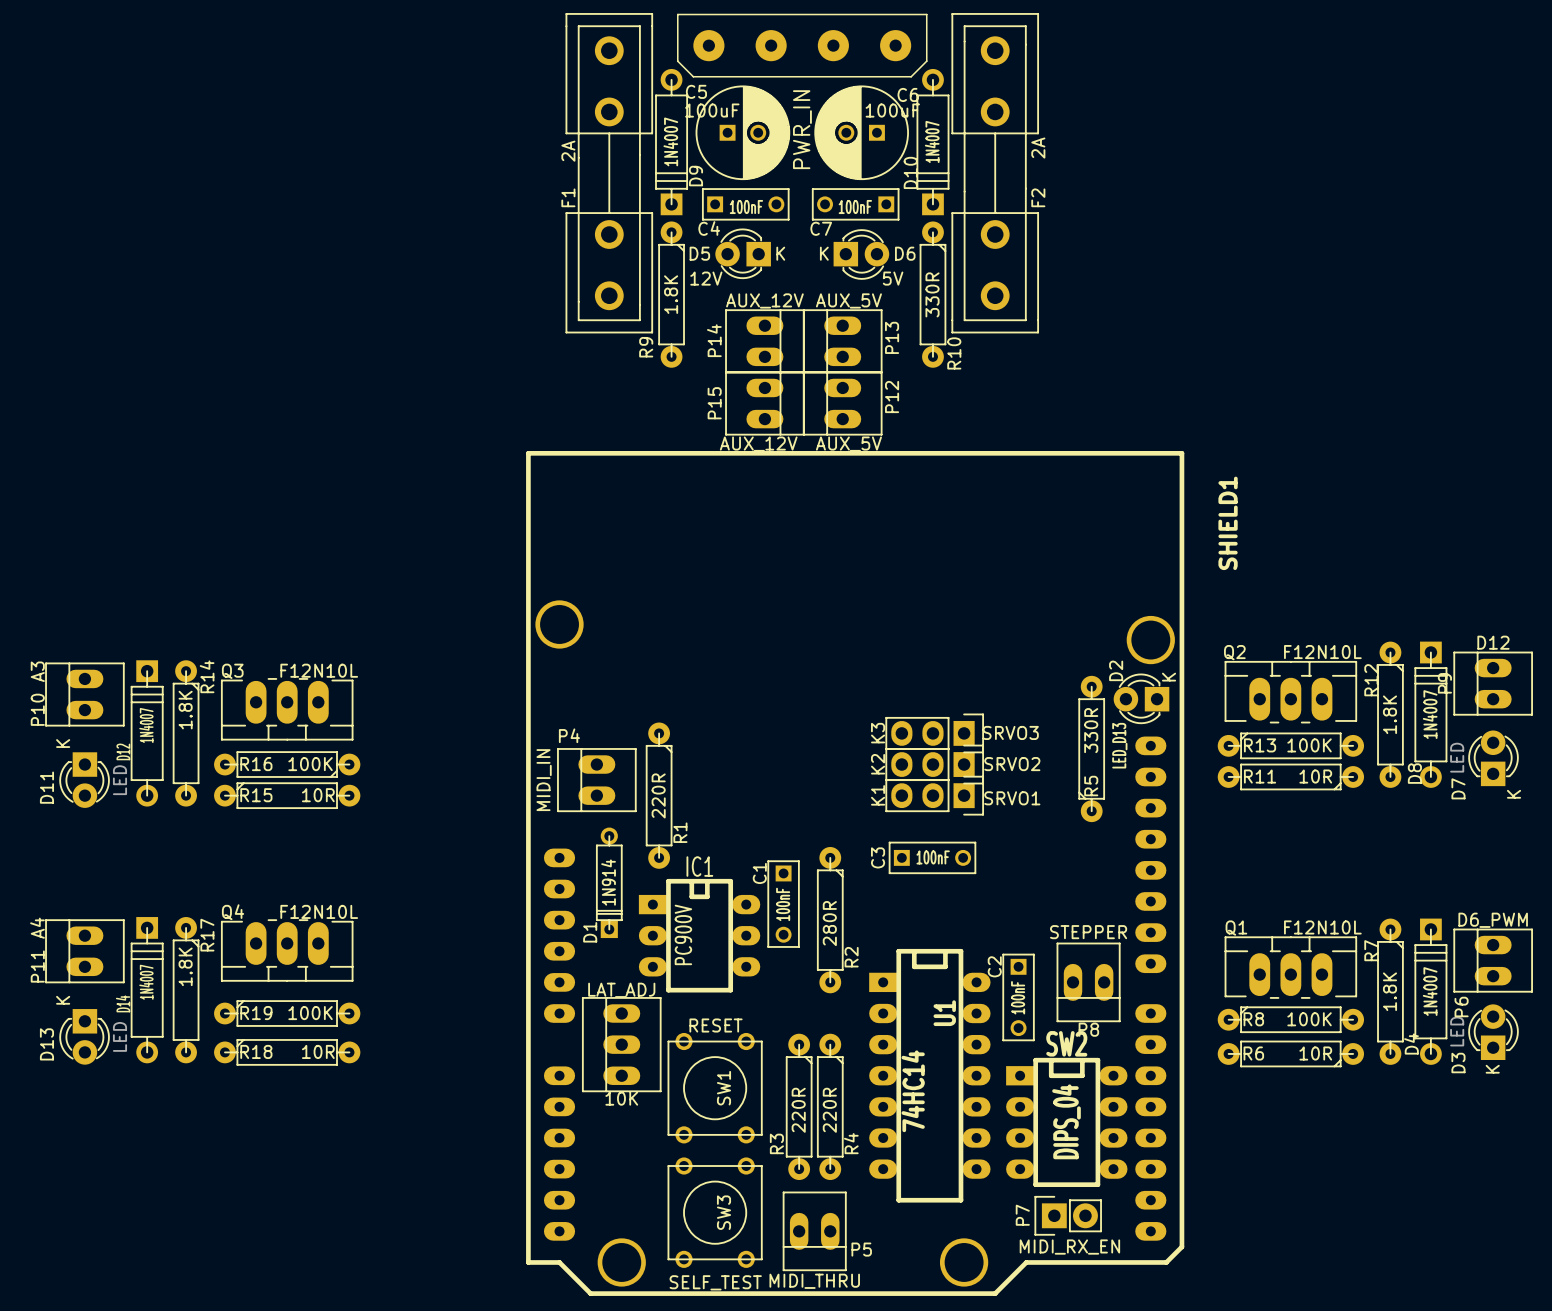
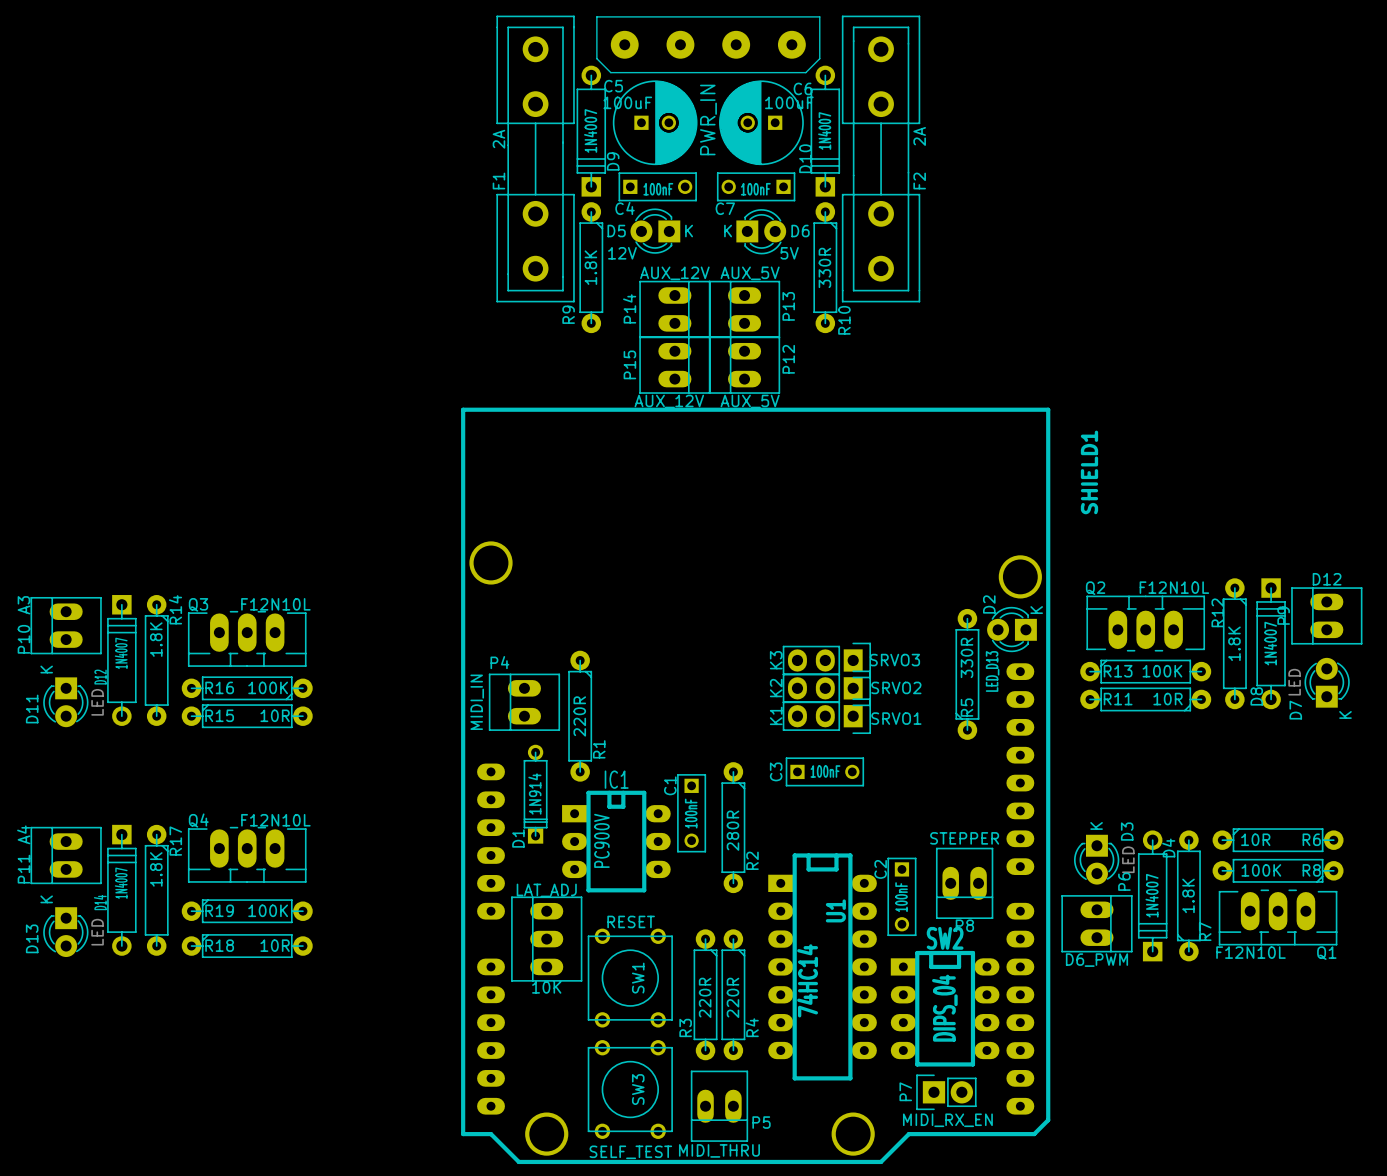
P6 rotation: 0° (1493, 960) -> 180° (1096, 923)
P6 position: (1493, 960) -> (1096, 923)
Q1 rotation: 0° (1290, 967) -> 180° (1278, 917)
Q1 position: (1290, 967) -> (1278, 917)
R7 rotation: 0° (1390, 991) -> 180° (1188, 895)
D4 rotation: 0° (1430, 991) -> 180° (1152, 895)
D4 position: (1430, 991) -> (1152, 895)
R8 rotation: 0° (1290, 1019) -> 180° (1278, 870)
R8 position: (1290, 1019) -> (1278, 870)
D3 rotation: 0° (1493, 1032) -> 180° (1096, 859)
D3 position: (1493, 1032) -> (1096, 859)
R6 rotation: 0° (1290, 1053) -> 180° (1278, 840)
R6 position: (1290, 1053) -> (1278, 840)

